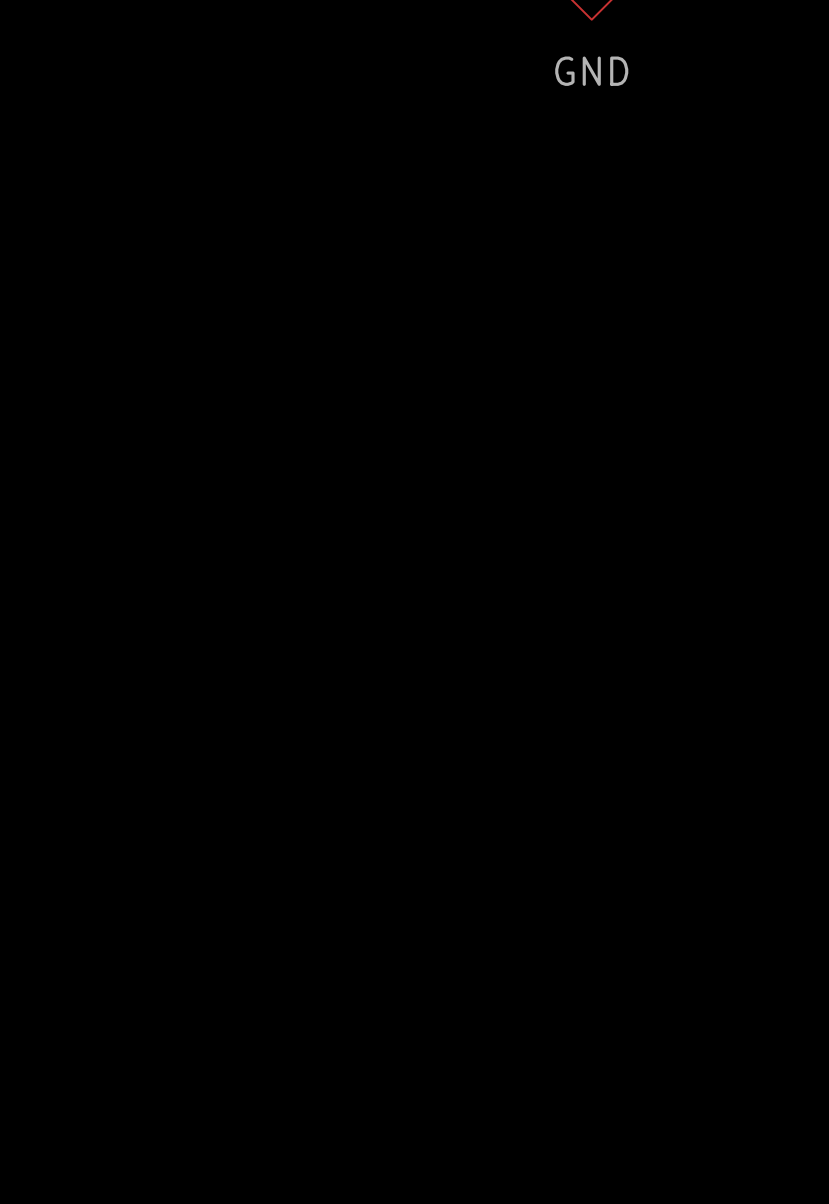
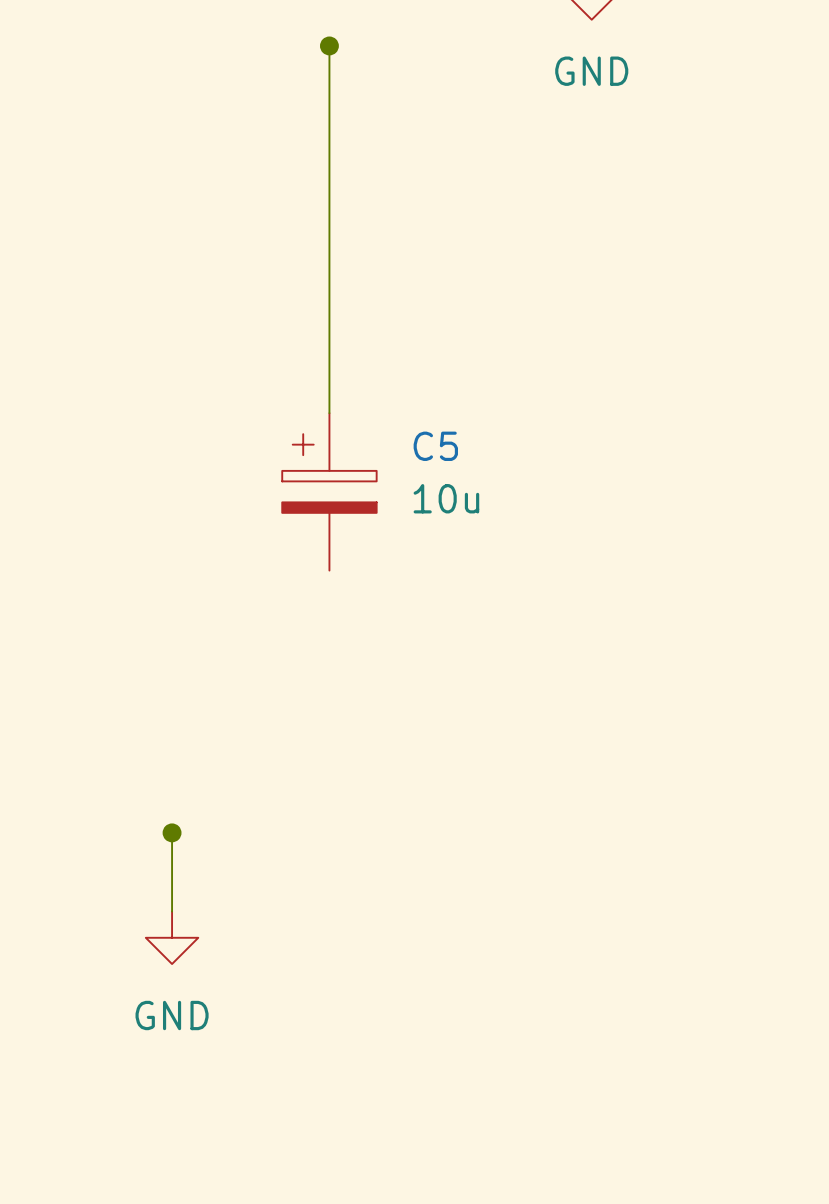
wire: none -> (329, 45) (329, 413)
junction: none -> (329, 45)
C5: none -> 10u (329, 491)
wire: none -> (172, 832) (172, 911)
junction: none -> (172, 832)
power symbol: none -> GND (172, 937)

